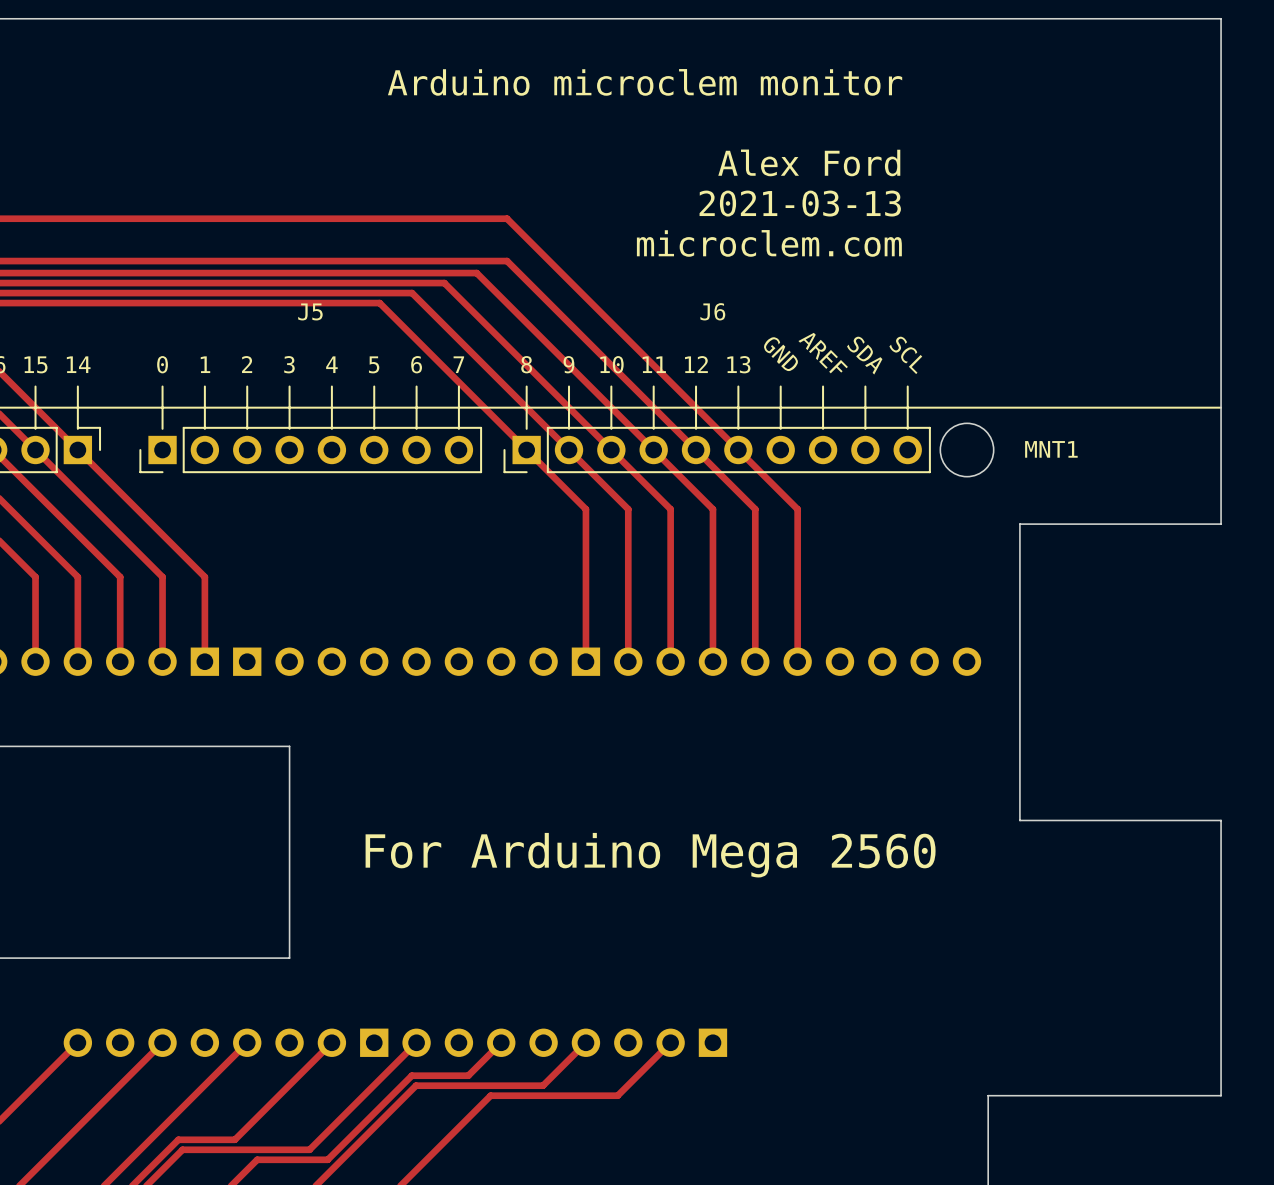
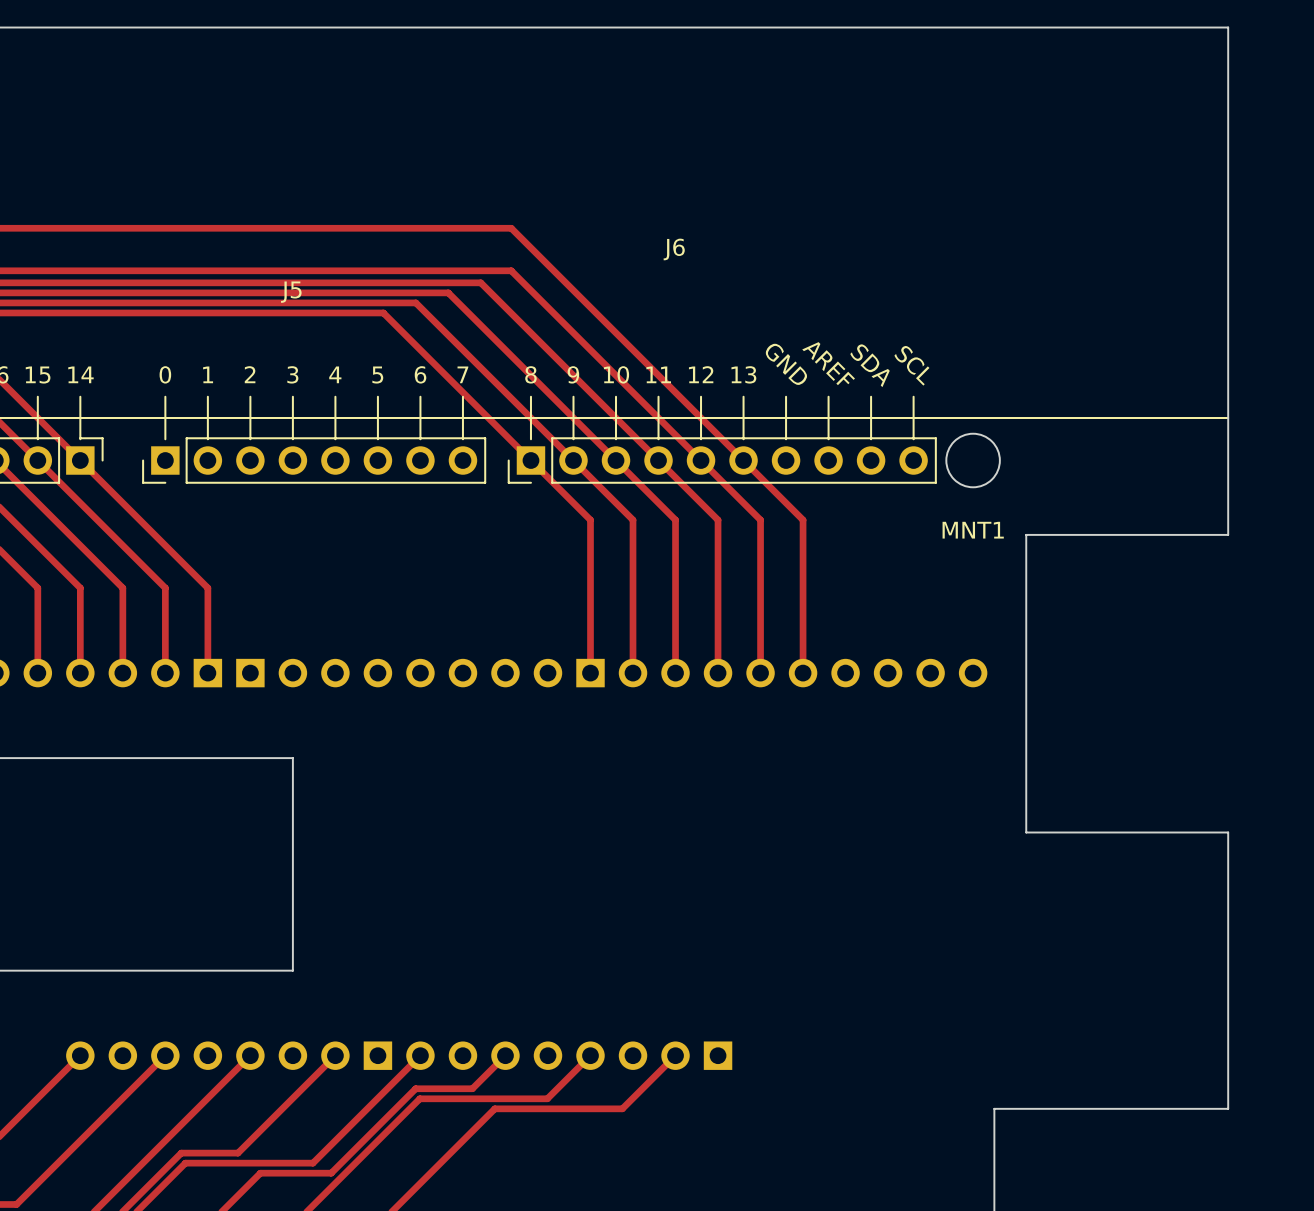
text: Arduino microclem monitor (645, 82) -> none
text: Alex Ford (809, 162) -> none
text: 2021-03-13 (800, 203) -> none
text: microclem.com (769, 243) -> none
J5 name position: J5 (310, 311) -> J5 (291, 292)
J6 name position: J6 (712, 311) -> J6 (674, 249)
MNT1 name position: MNT1 (1051, 449) -> MNT1 (973, 530)
text: For Arduino Mega 2560 (650, 855) -> none

